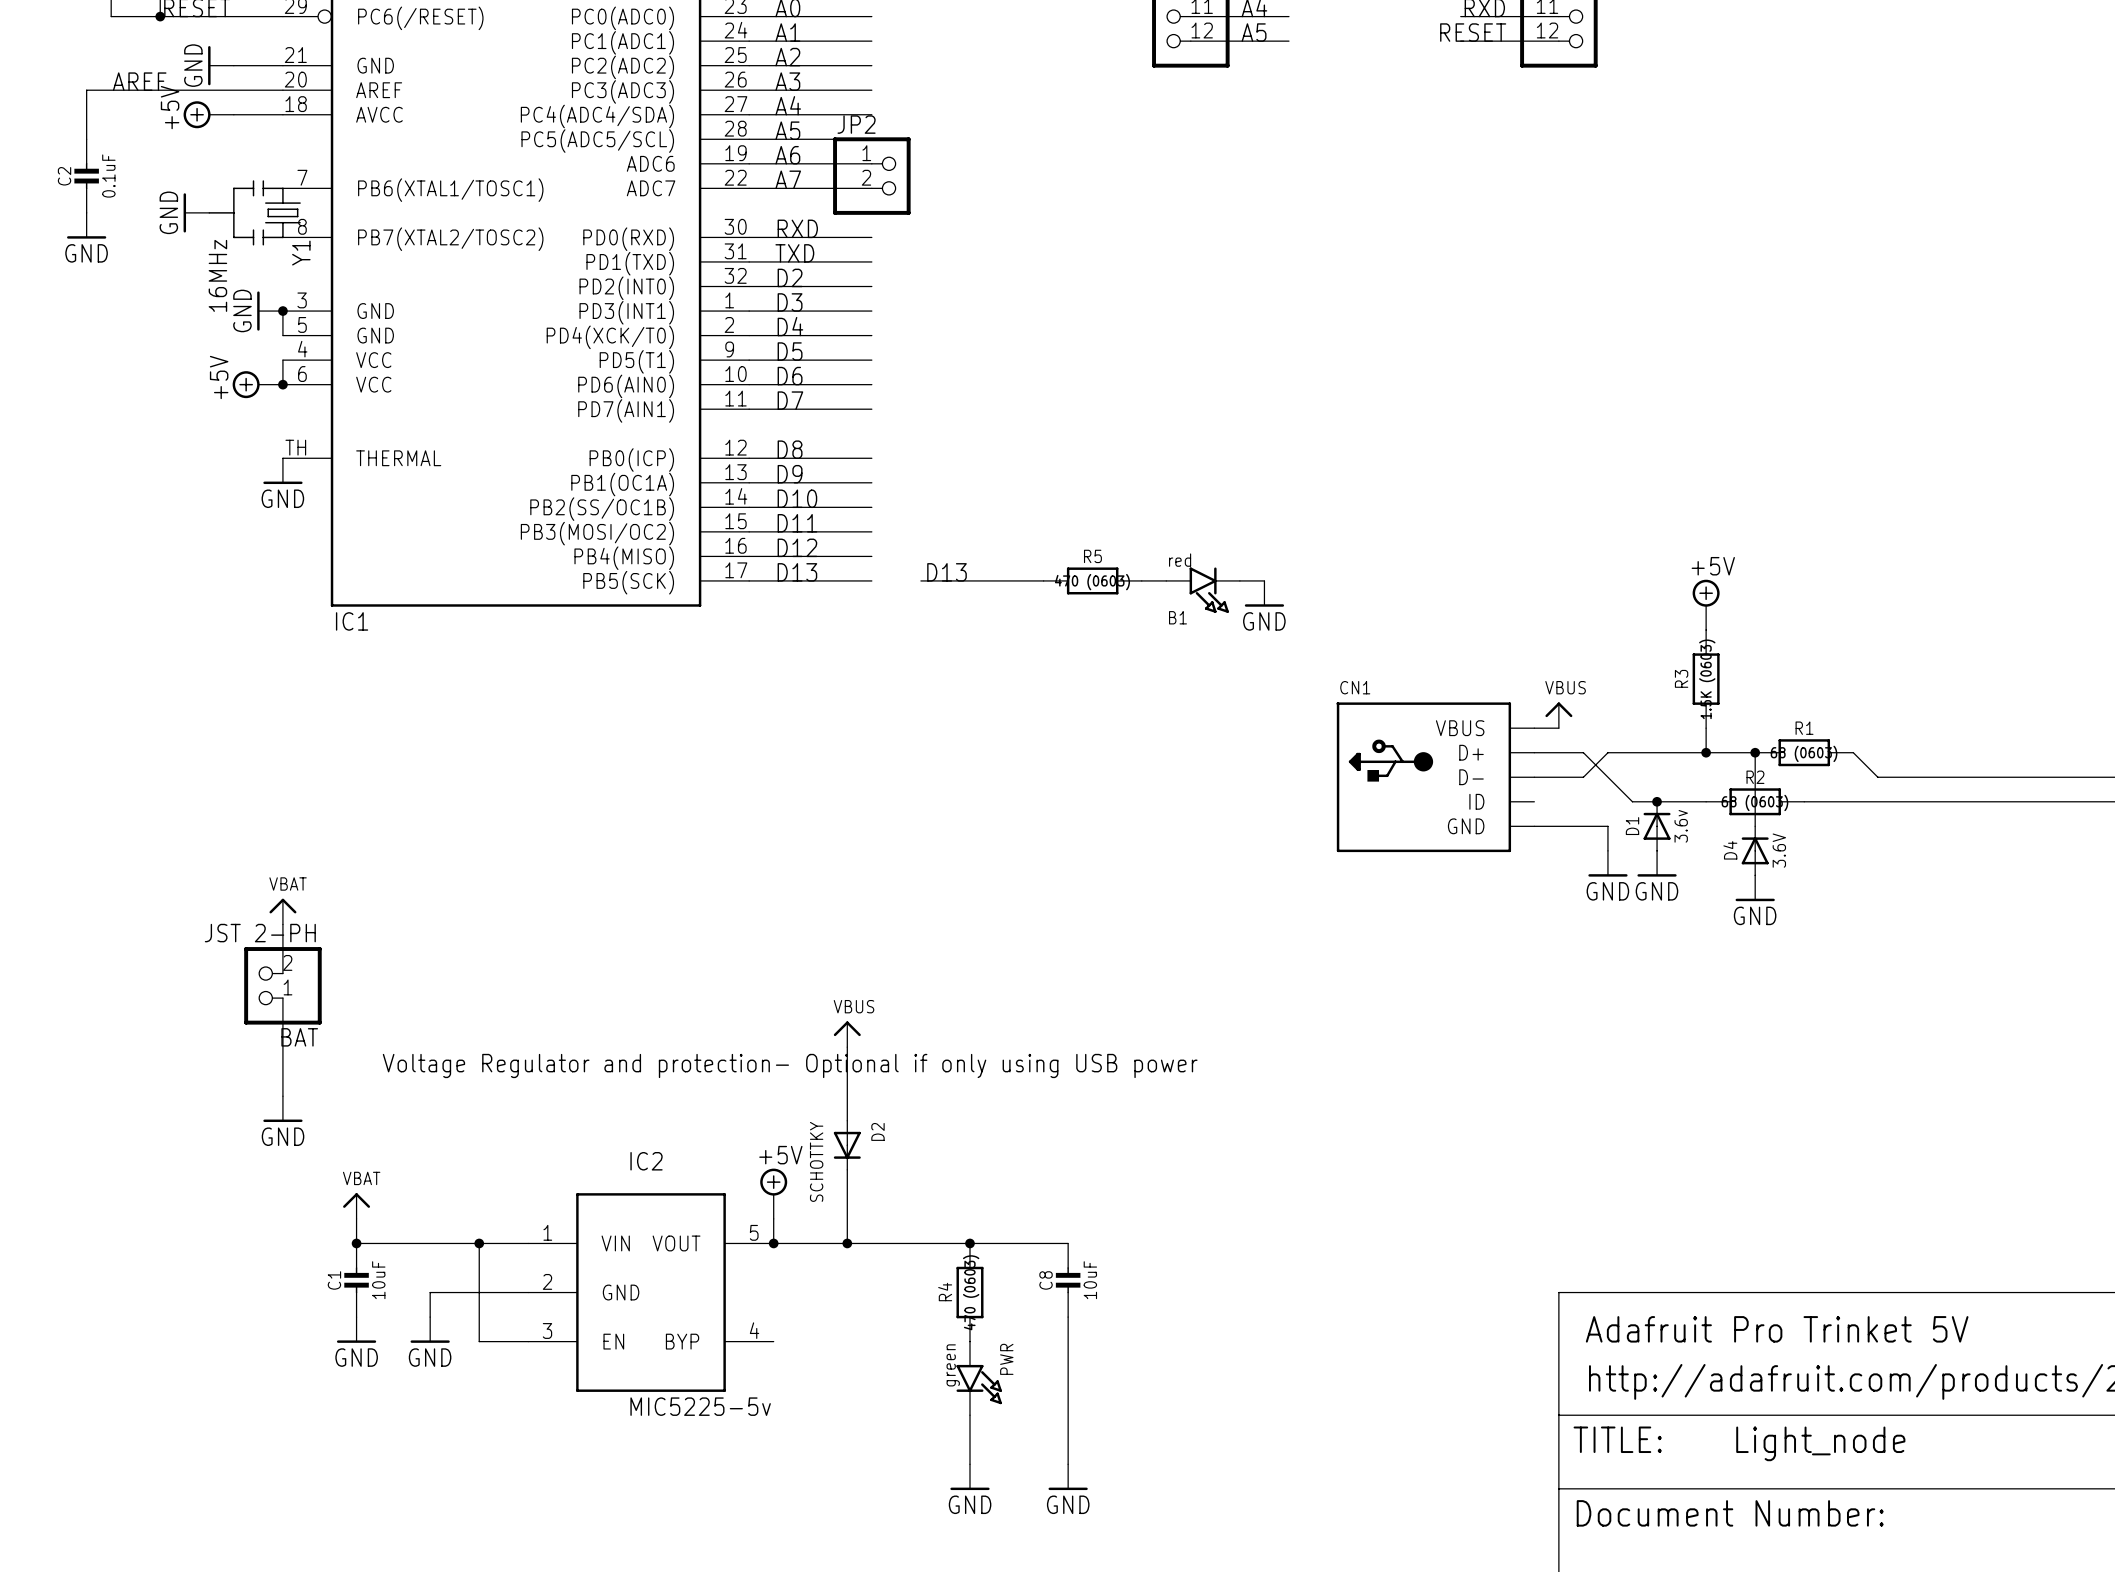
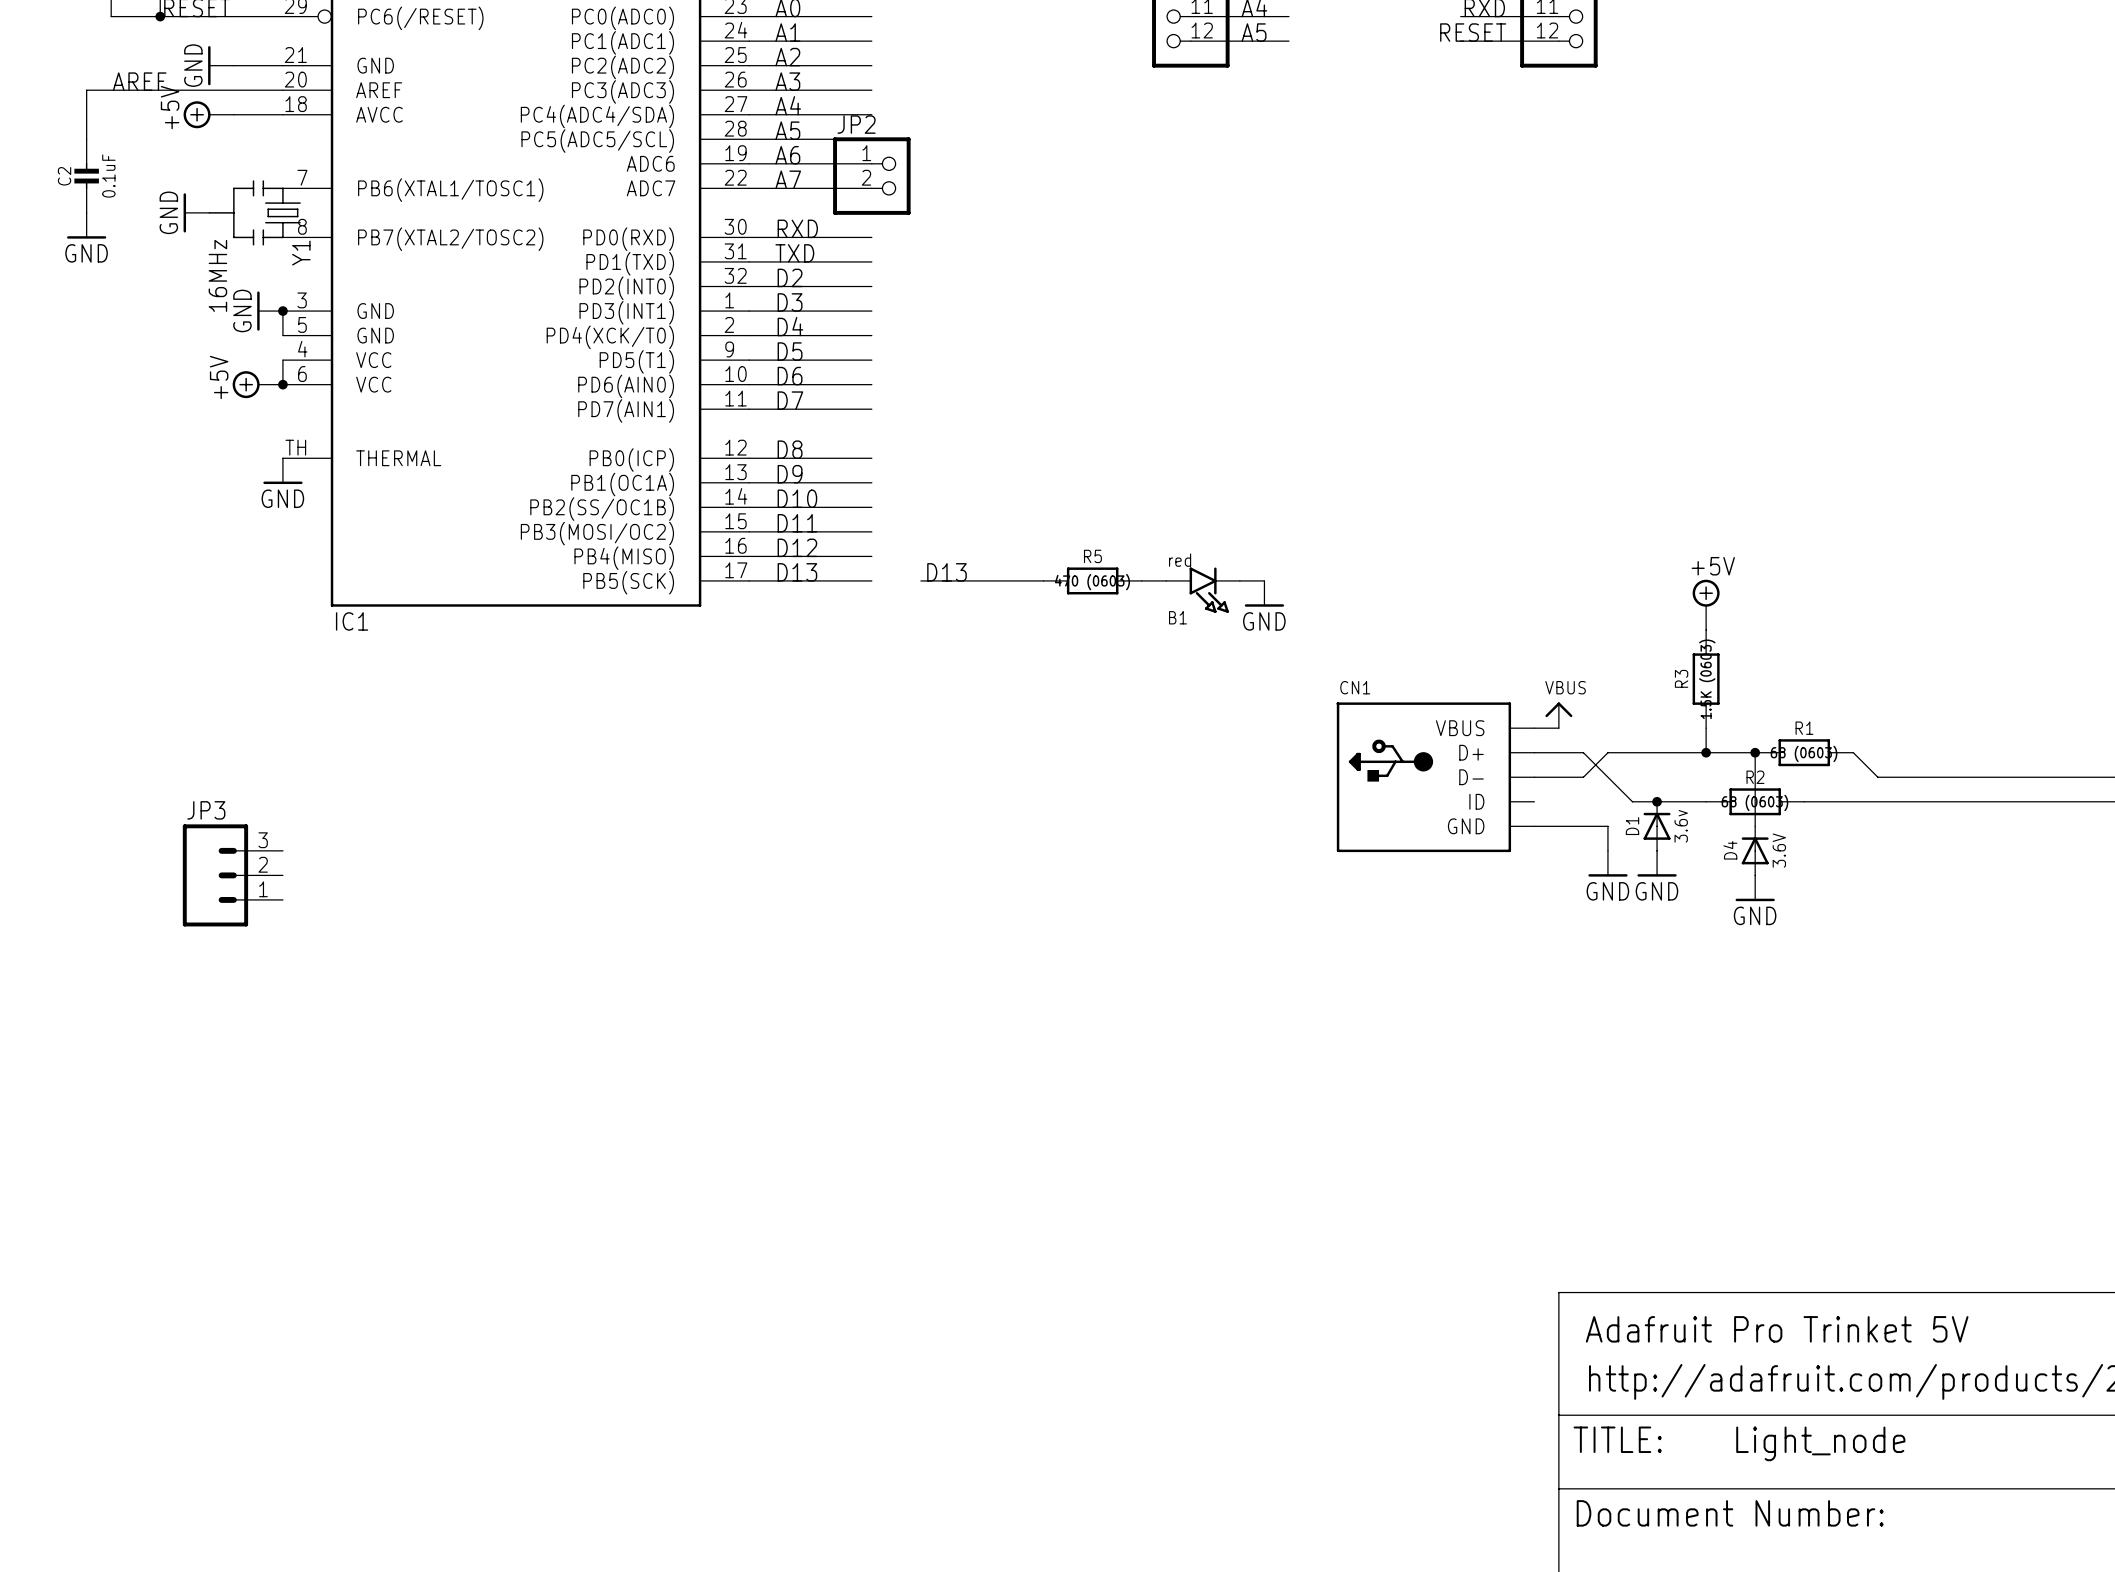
JP3: none -> (232, 875)
power symbol: VBAT (282, 911) -> none
wire: (282, 924) (282, 973) -> none
BAT: JST 2-PH (282, 985) -> none
wire: (282, 998) (282, 1096) -> none
power symbol: VBUS (847, 1034) -> none
wire: (847, 1047) (847, 1120) -> none
text: Voltage Regulator and protection- Optional if only using USB power (790, 1065) -> none
power symbol: GND (282, 1109) -> none
D2: SCHOTTKY (847, 1145) -> none
wire: (847, 1169) (847, 1243) -> none
power symbol: +5V (773, 1193) -> none
power symbol: VBAT (356, 1206) -> none
wire: (356, 1218) (356, 1243) (528, 1243) -> none
wire: (773, 1218) (773, 1243) (1068, 1243) -> none
junction: (356, 1243) -> none
wire: (479, 1243) (479, 1341) (528, 1341) -> none
junction: (479, 1243) -> none
junction: (773, 1243) -> none
junction: (847, 1243) -> none
junction: (969, 1243) -> none
C1: 10uF (356, 1280) -> none
C8: 10uF (1068, 1280) -> none
wire: (528, 1292) (430, 1292) (430, 1317) -> none
IC2: MIC5225-5v (651, 1292) -> none
R4: 470 (0603) (969, 1292) -> none
wire: (1068, 1317) (1068, 1464) -> none
power symbol: GND (356, 1329) -> none
power symbol: GND (430, 1329) -> none
PWR: green (979, 1378) -> none
wire: (969, 1415) (969, 1464) -> none
power symbol: GND (969, 1477) -> none
power symbol: GND (1068, 1477) -> none

